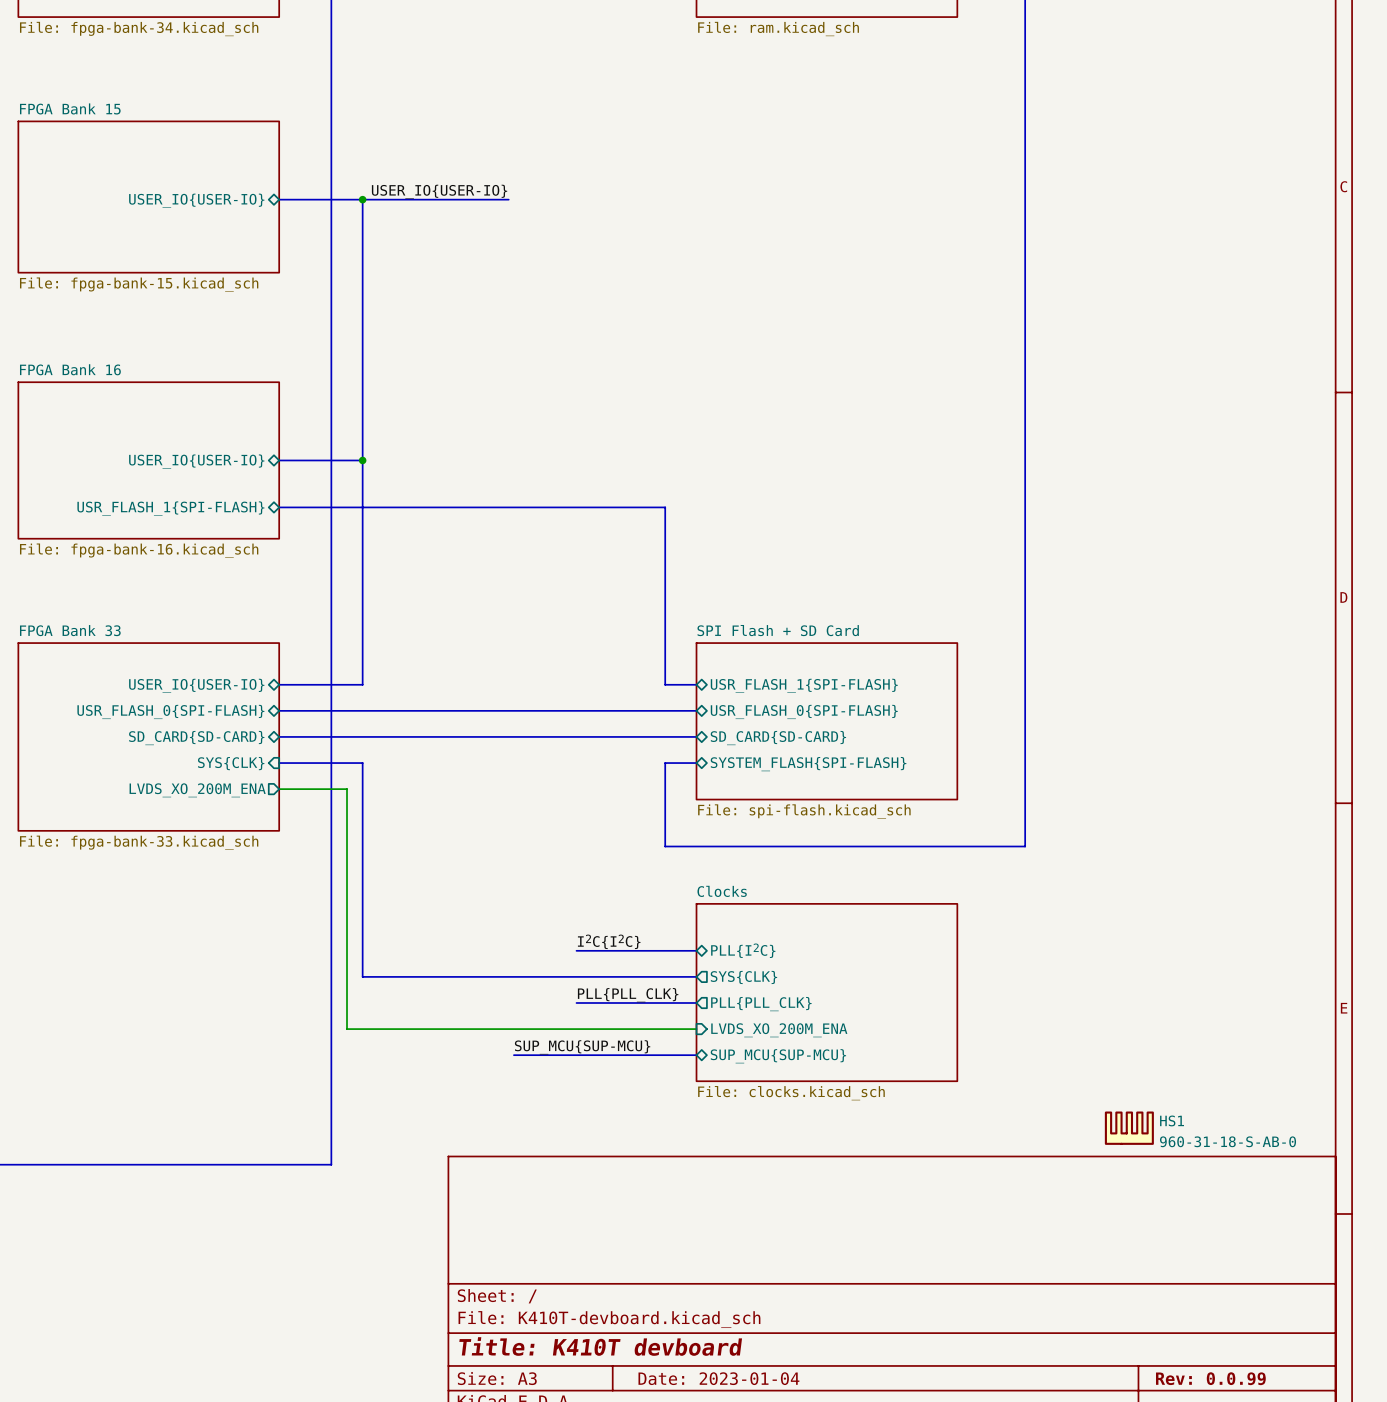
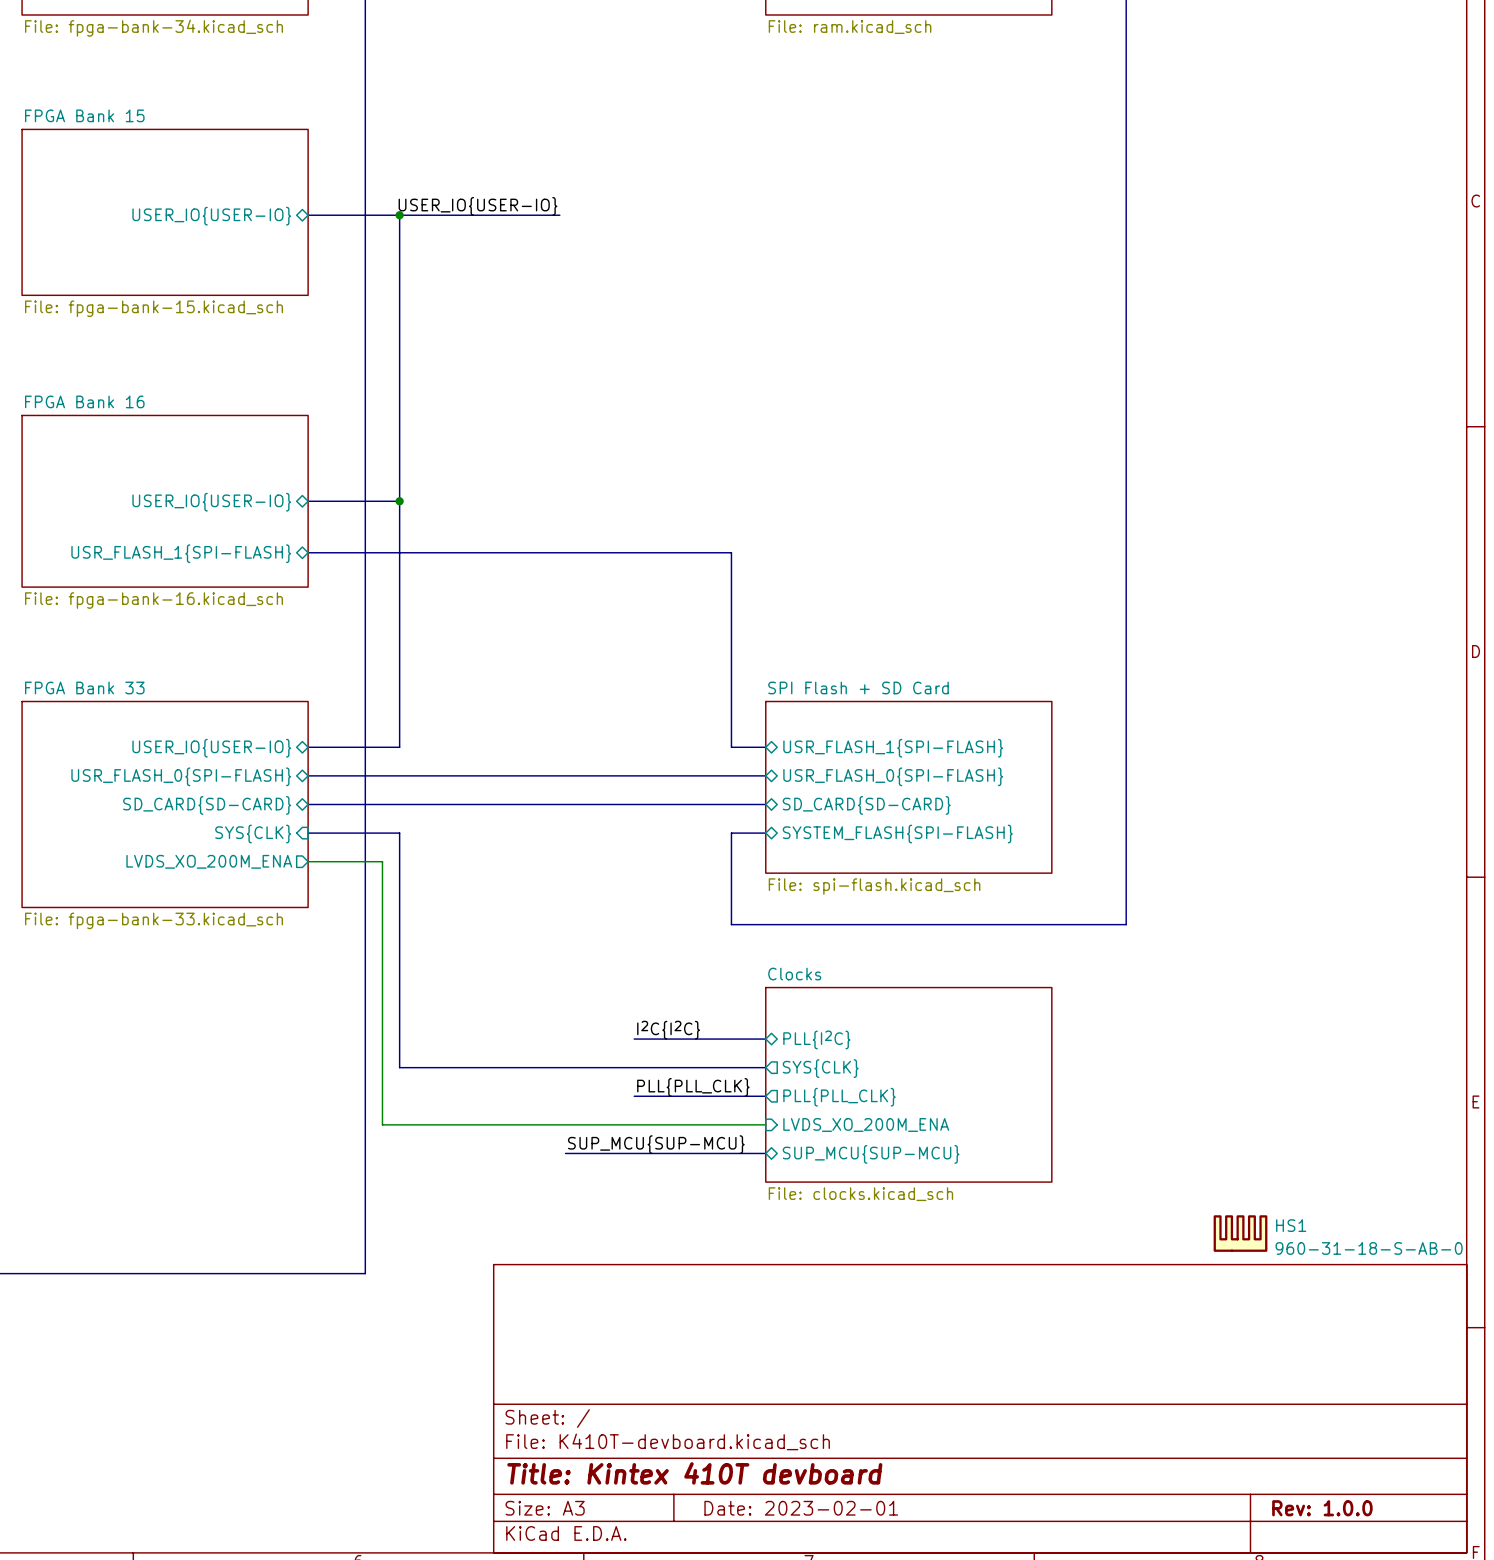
title block: Title: K410T devboard (600, 1346) -> Title: Kintex 410T devboard (694, 1473)
title block: Date: 2023-01-04 (718, 1378) -> Date: 2023-02-01 (801, 1508)
title block: Rev: 0.0.99 (1210, 1378) -> Rev: 1.0.0 (1322, 1508)

